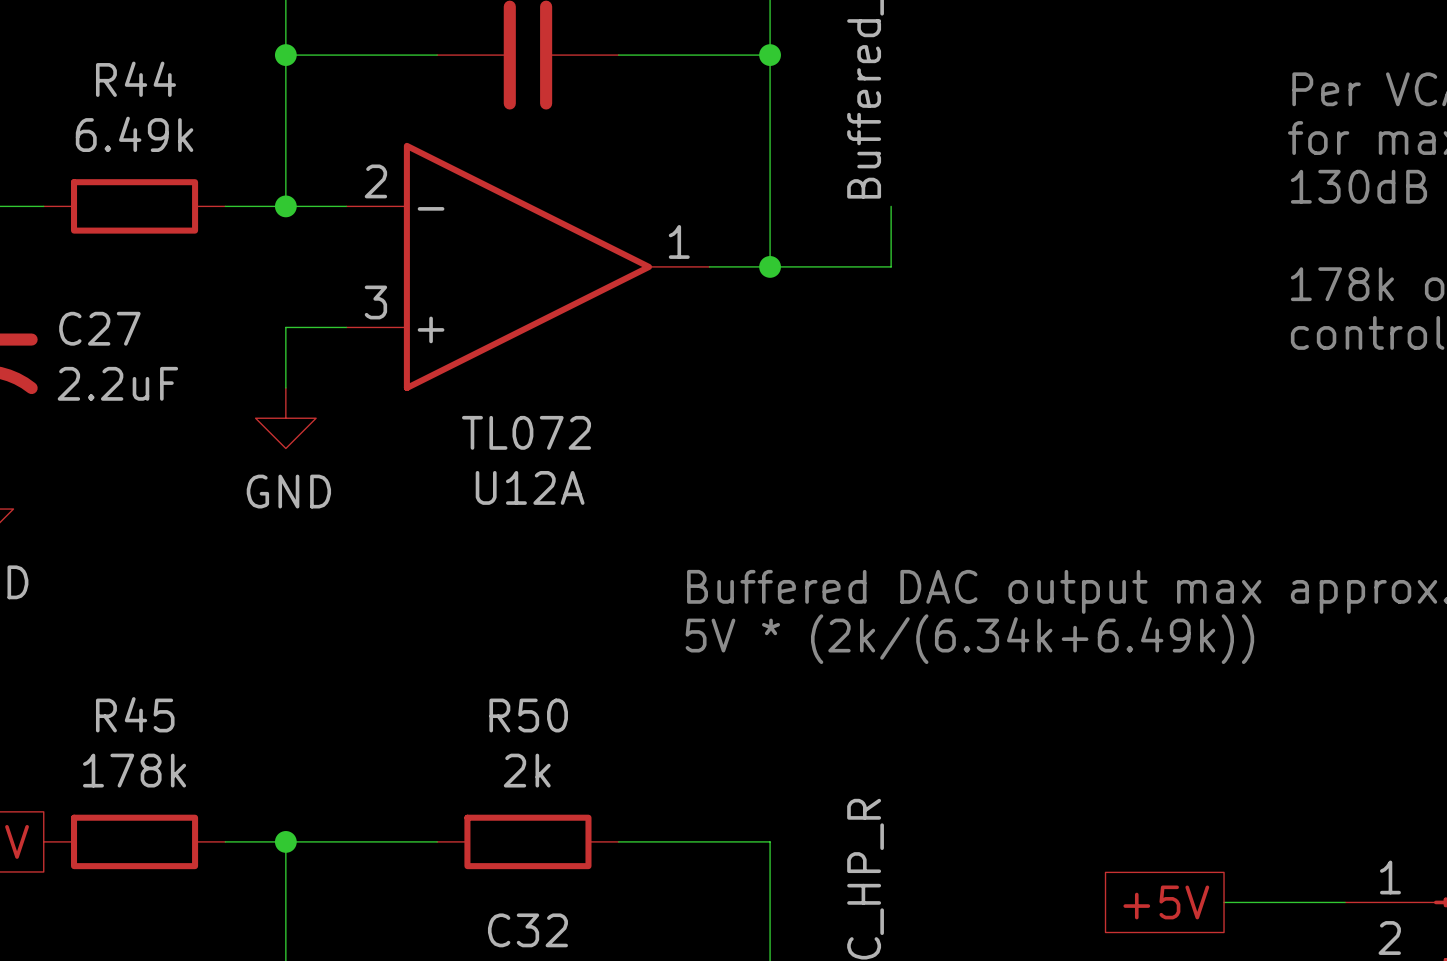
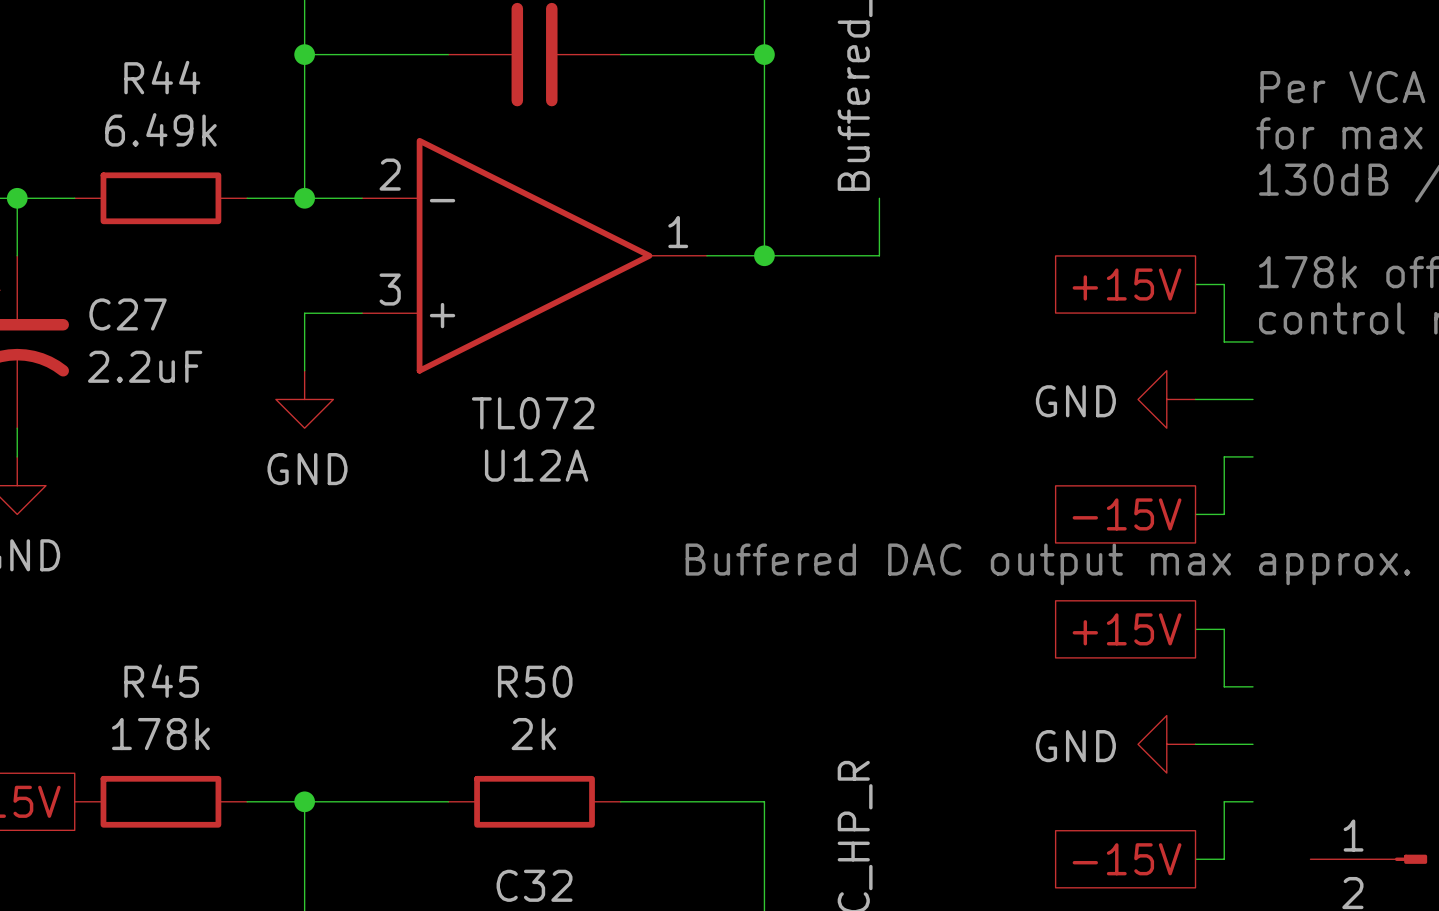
global label: none -> +15V (1127, 284)
wire: none -> (1195, 284) (1224, 284) (1224, 341) (1252, 341)
power symbol: none -> GND (1166, 399)
wire: none -> (1195, 399) (1252, 399)
wire: none -> (1252, 456) (1224, 456) (1224, 514) (1195, 514)
global label: none -> -15V (1127, 514)
text: 5V * (2k/(6.34k+6.49k)) (969, 639) -> none
global label: none -> +15V (1127, 629)
wire: none -> (1195, 629) (1224, 629) (1224, 686) (1252, 686)
power symbol: none -> GND (1166, 744)
wire: none -> (1195, 744) (1252, 744)
global label: +5V (1166, 902) -> -15V (1127, 859)
wire: (1254, 902) (1345, 902) -> (1224, 859) (1224, 801) (1252, 801)

